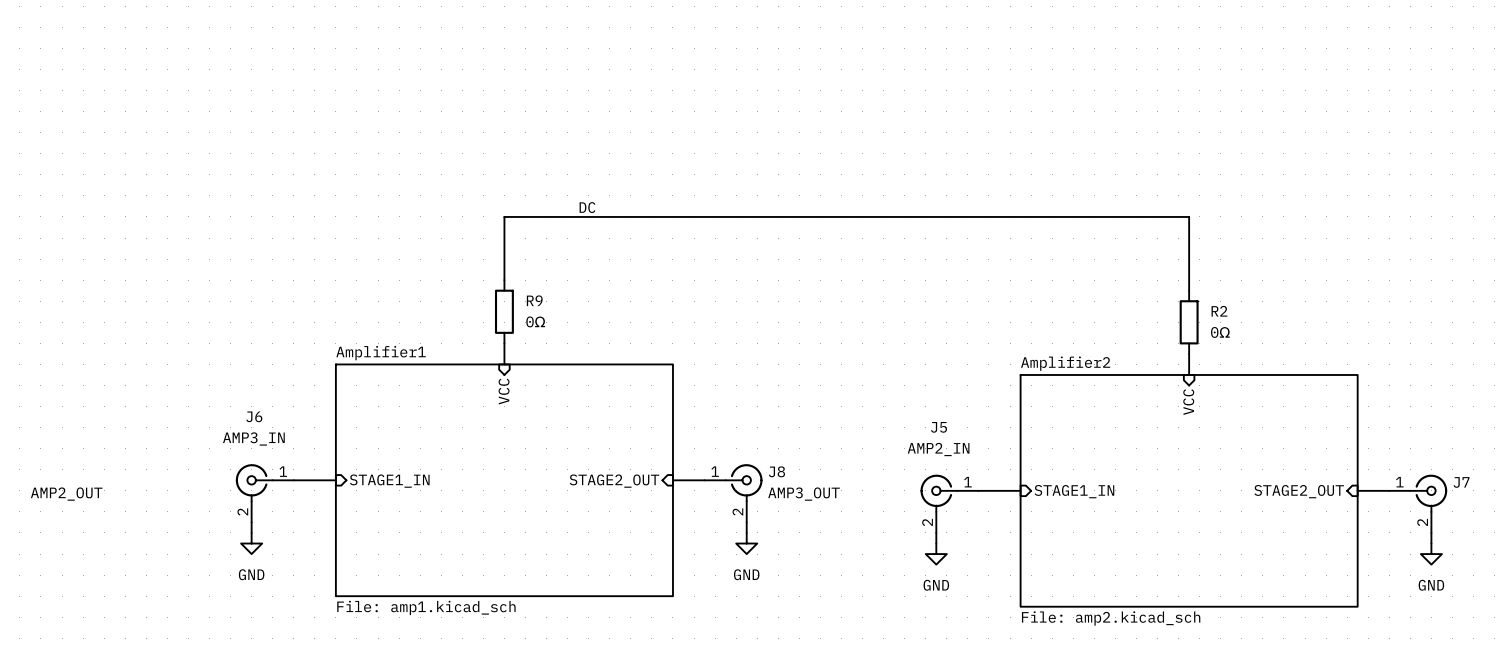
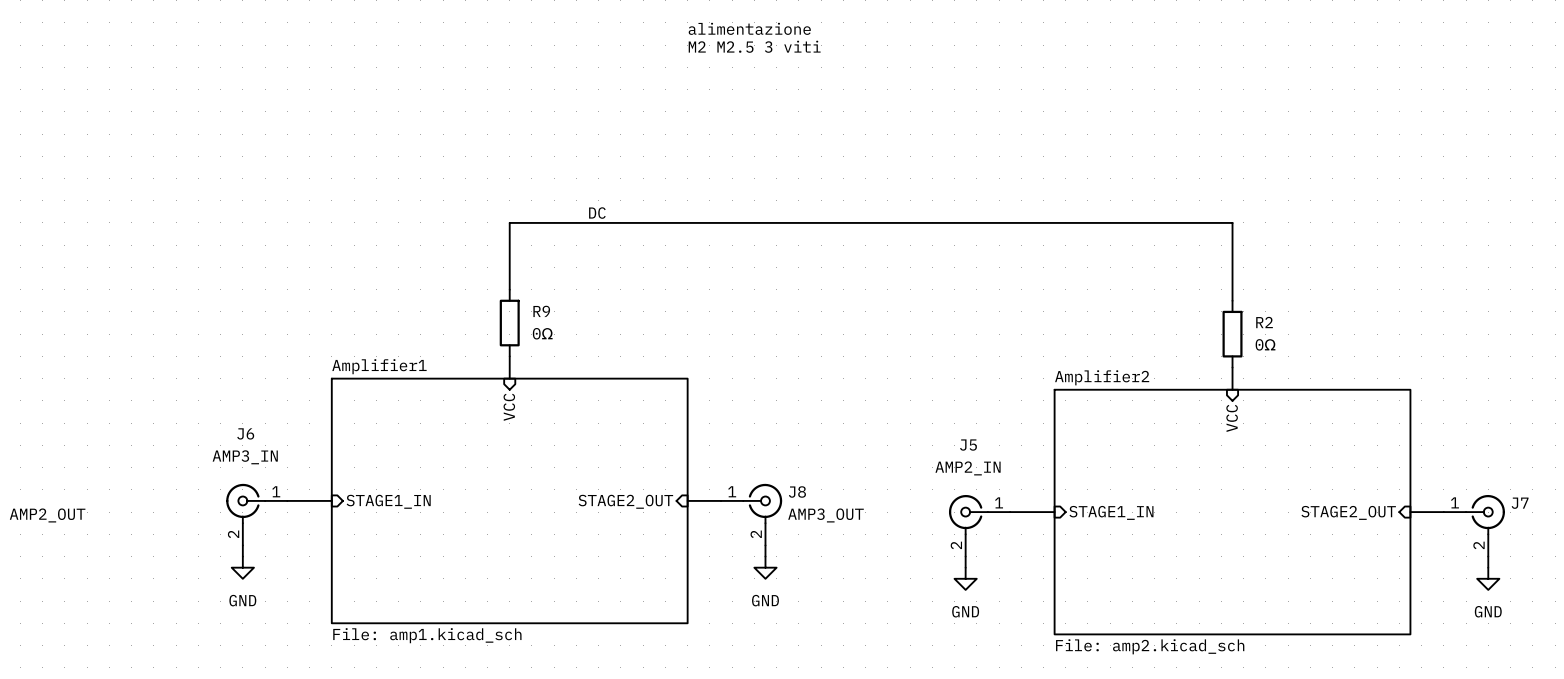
text: none -> alimentazione (749, 28)
text: none -> M2 M2.5 3 viti (754, 46)

